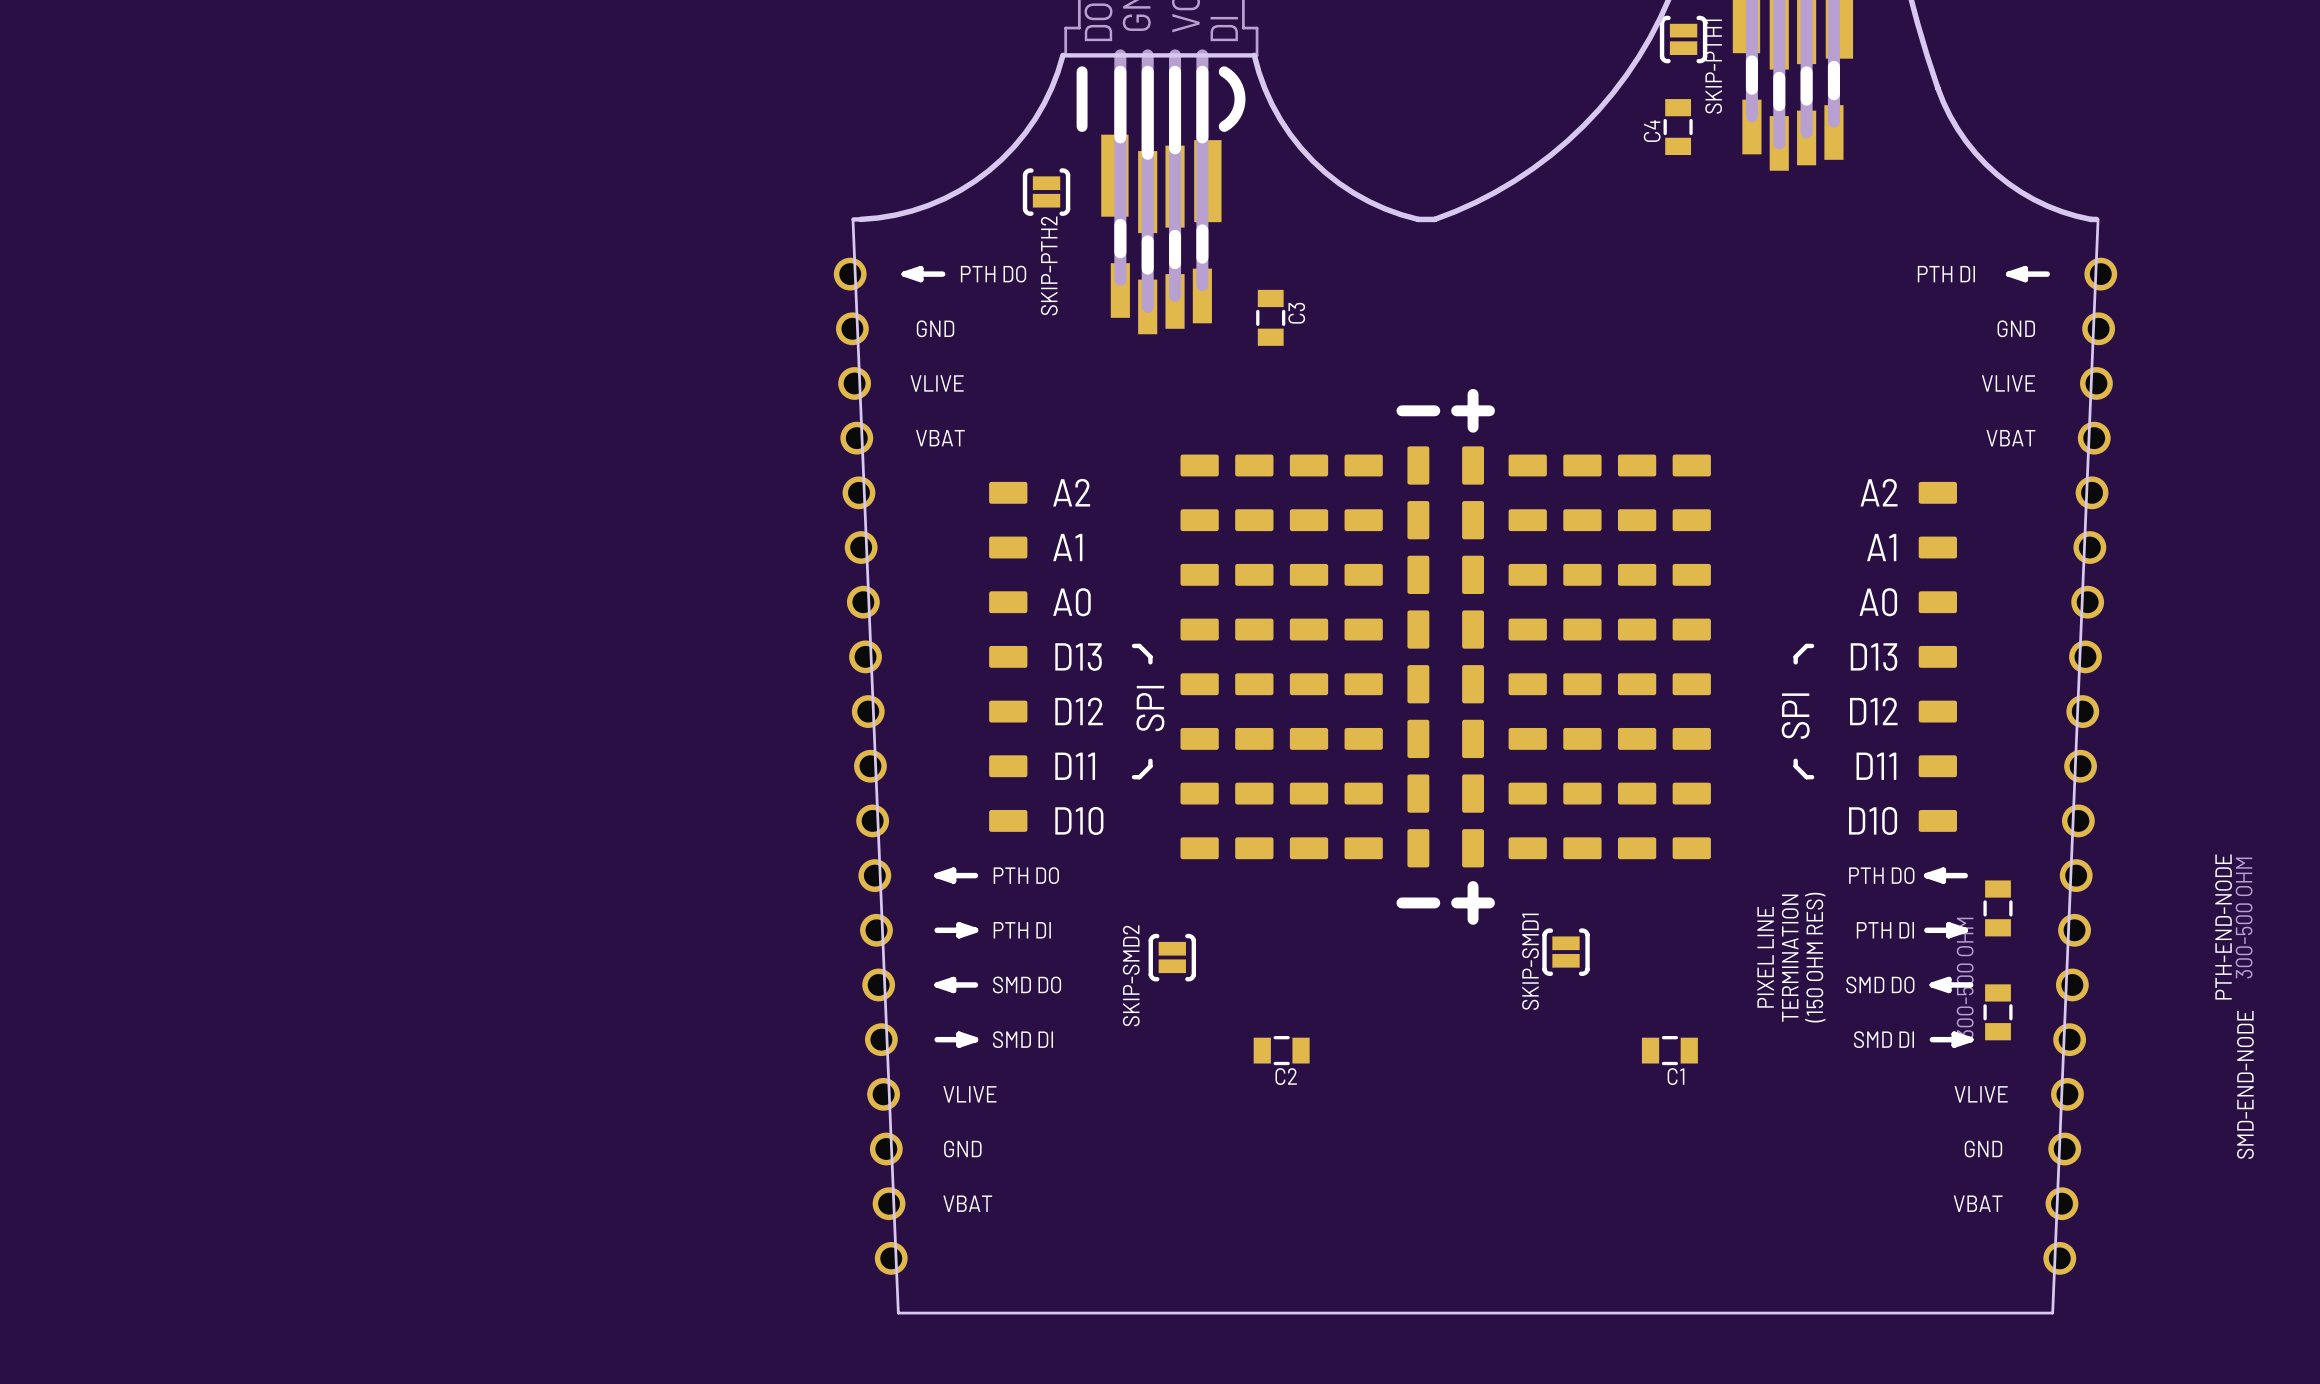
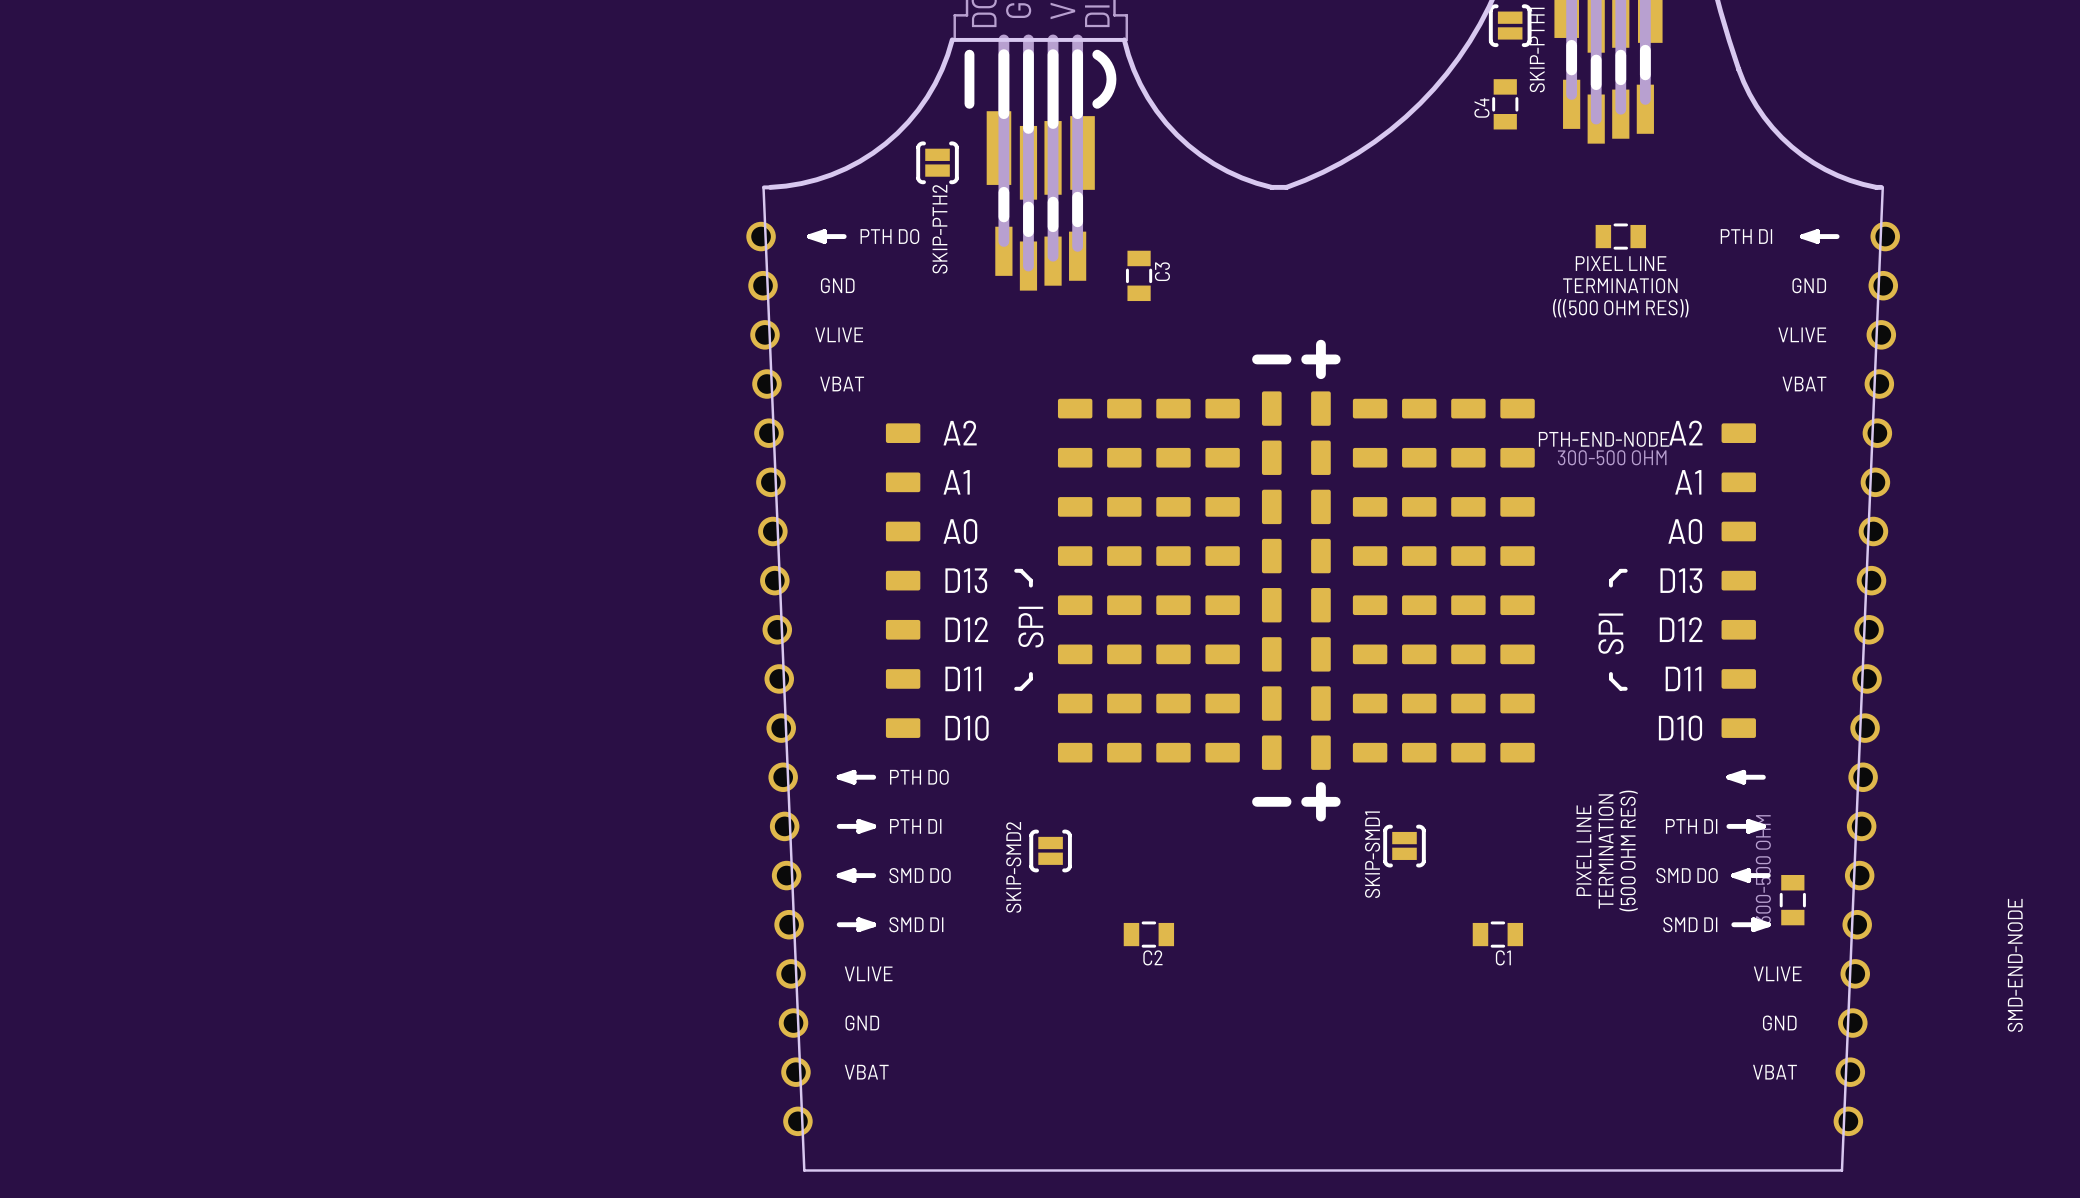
PTH-END-NODE: none -> 300-500 OHM (1620, 236)
text: none -> PIXEL LINE (1621, 263)
text: none -> TERMINATION (1620, 285)
text: none -> (((500 OHM RES)) (1620, 308)
text: PTH DO (1881, 875) -> none
PTH-END-NODE: 300-500 OHM (1998, 908) -> none
text: (150 OHM RES) (1815, 957) -> (500 OHM RES) (1628, 850)

